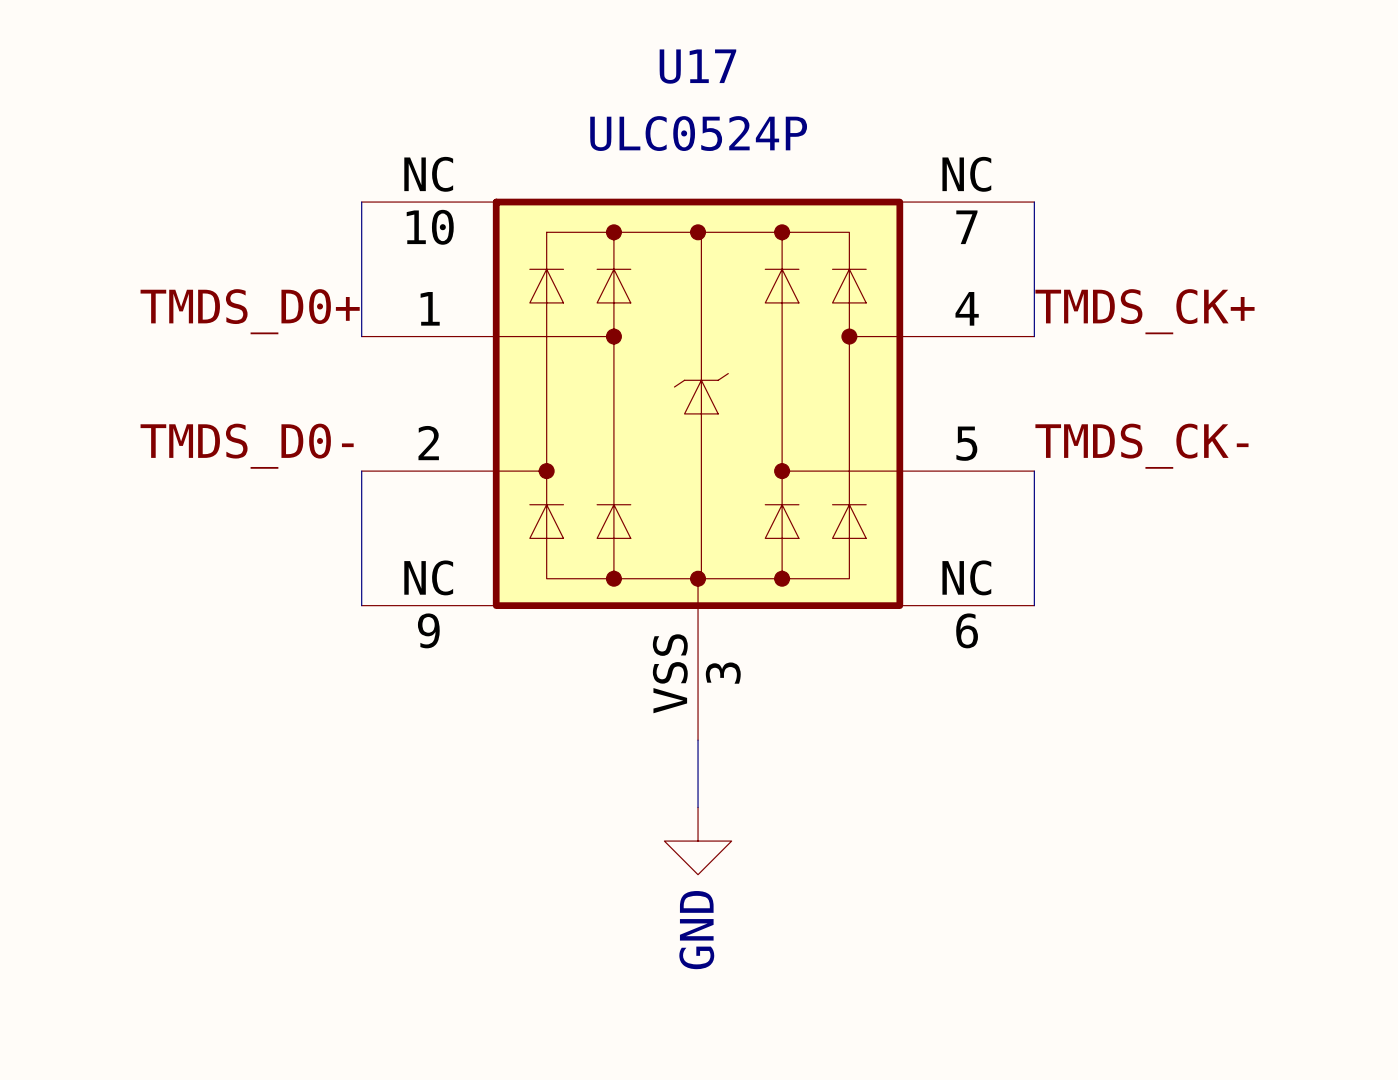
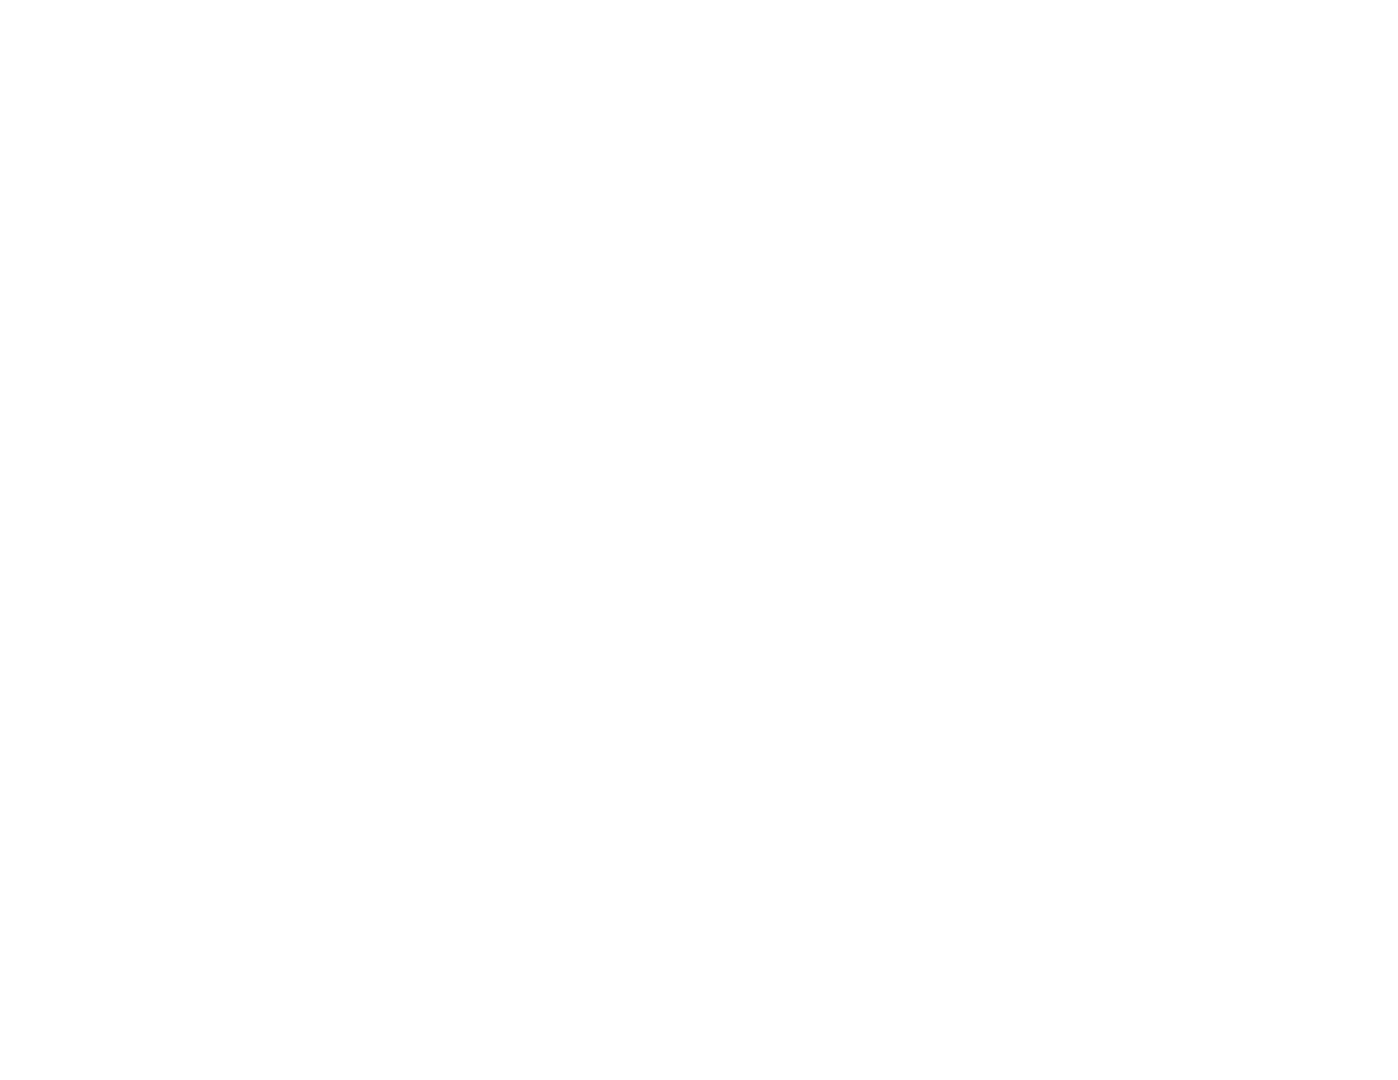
wire: (361, 202) (361, 336) -> none
wire: (1034, 202) (1034, 336) -> none
label: TMDS_D0+ (250, 311) -> none
label: TMDS_CK+ (1144, 311) -> none
label: TMDS_D0- (247, 446) -> none
label: TMDS_CK- (1141, 446) -> none
U17: ULC0524P (698, 469) -> none
wire: (361, 471) (361, 605) -> none
wire: (1034, 471) (1034, 605) -> none
wire: (698, 740) (698, 807) -> none
power symbol: GND (698, 841) -> none

